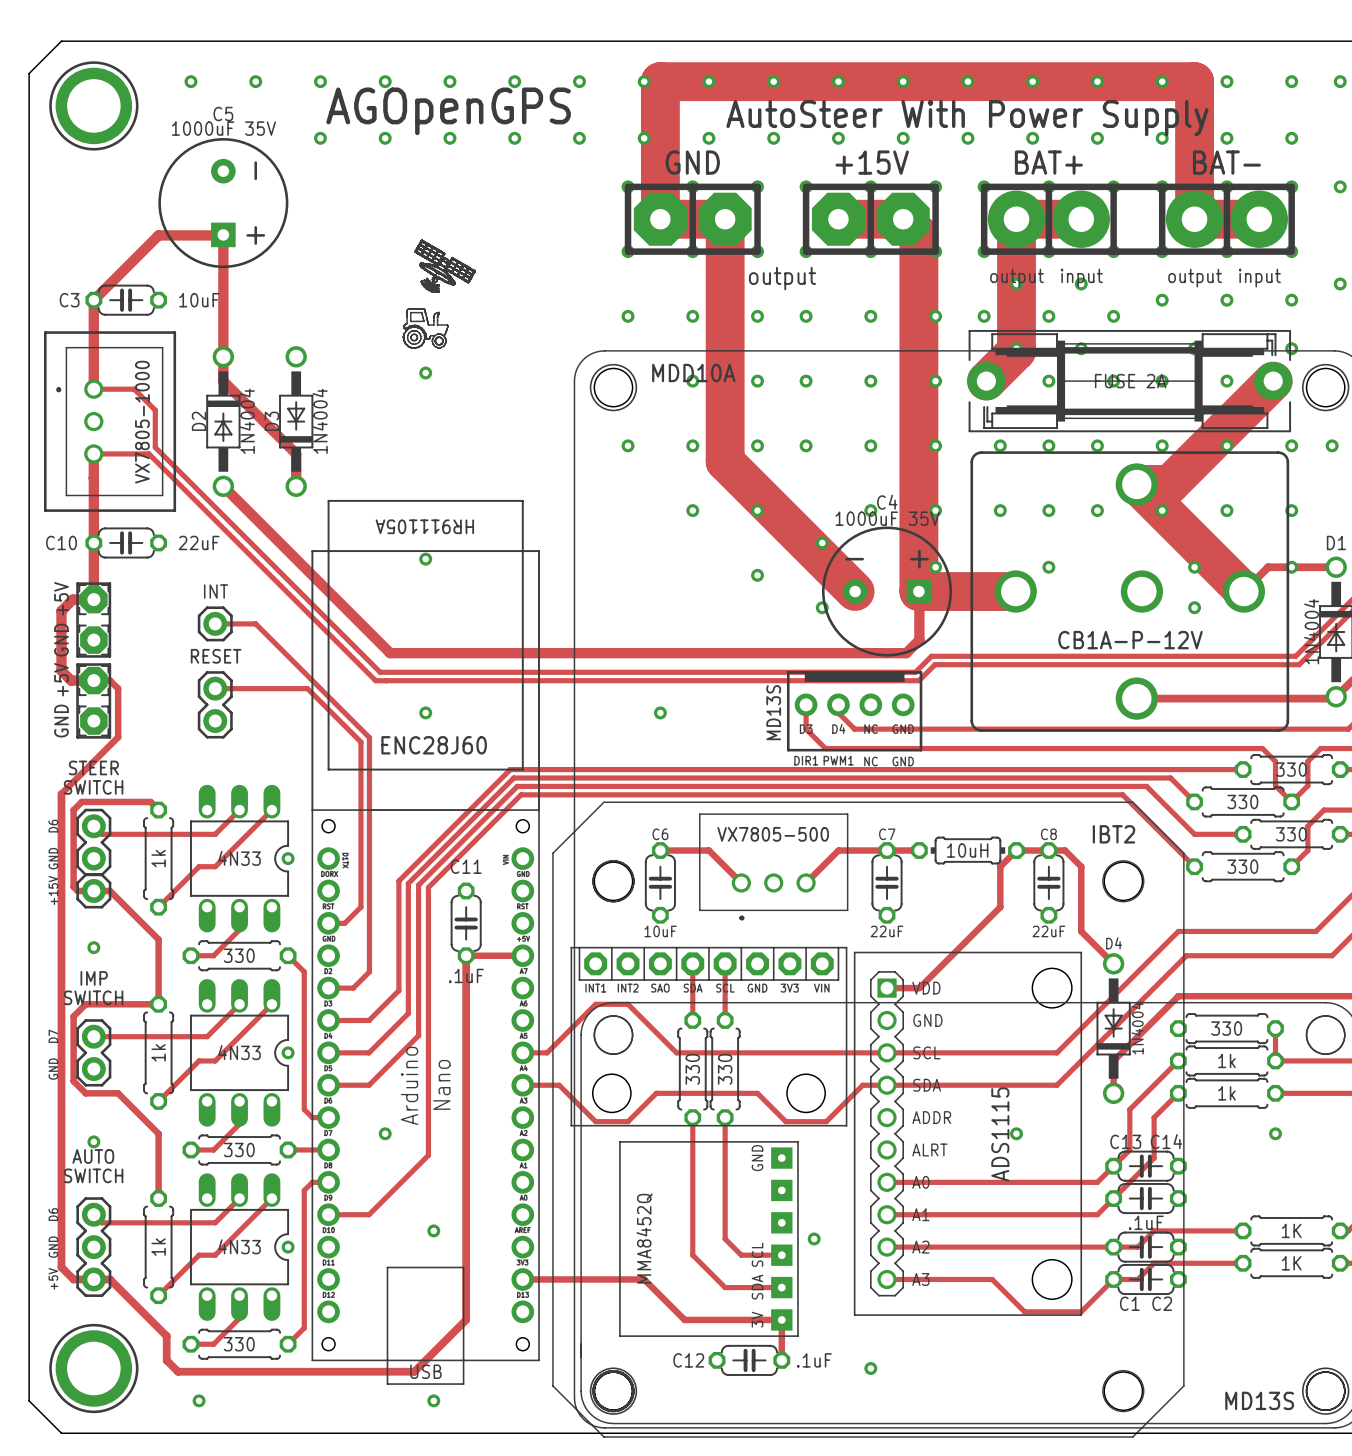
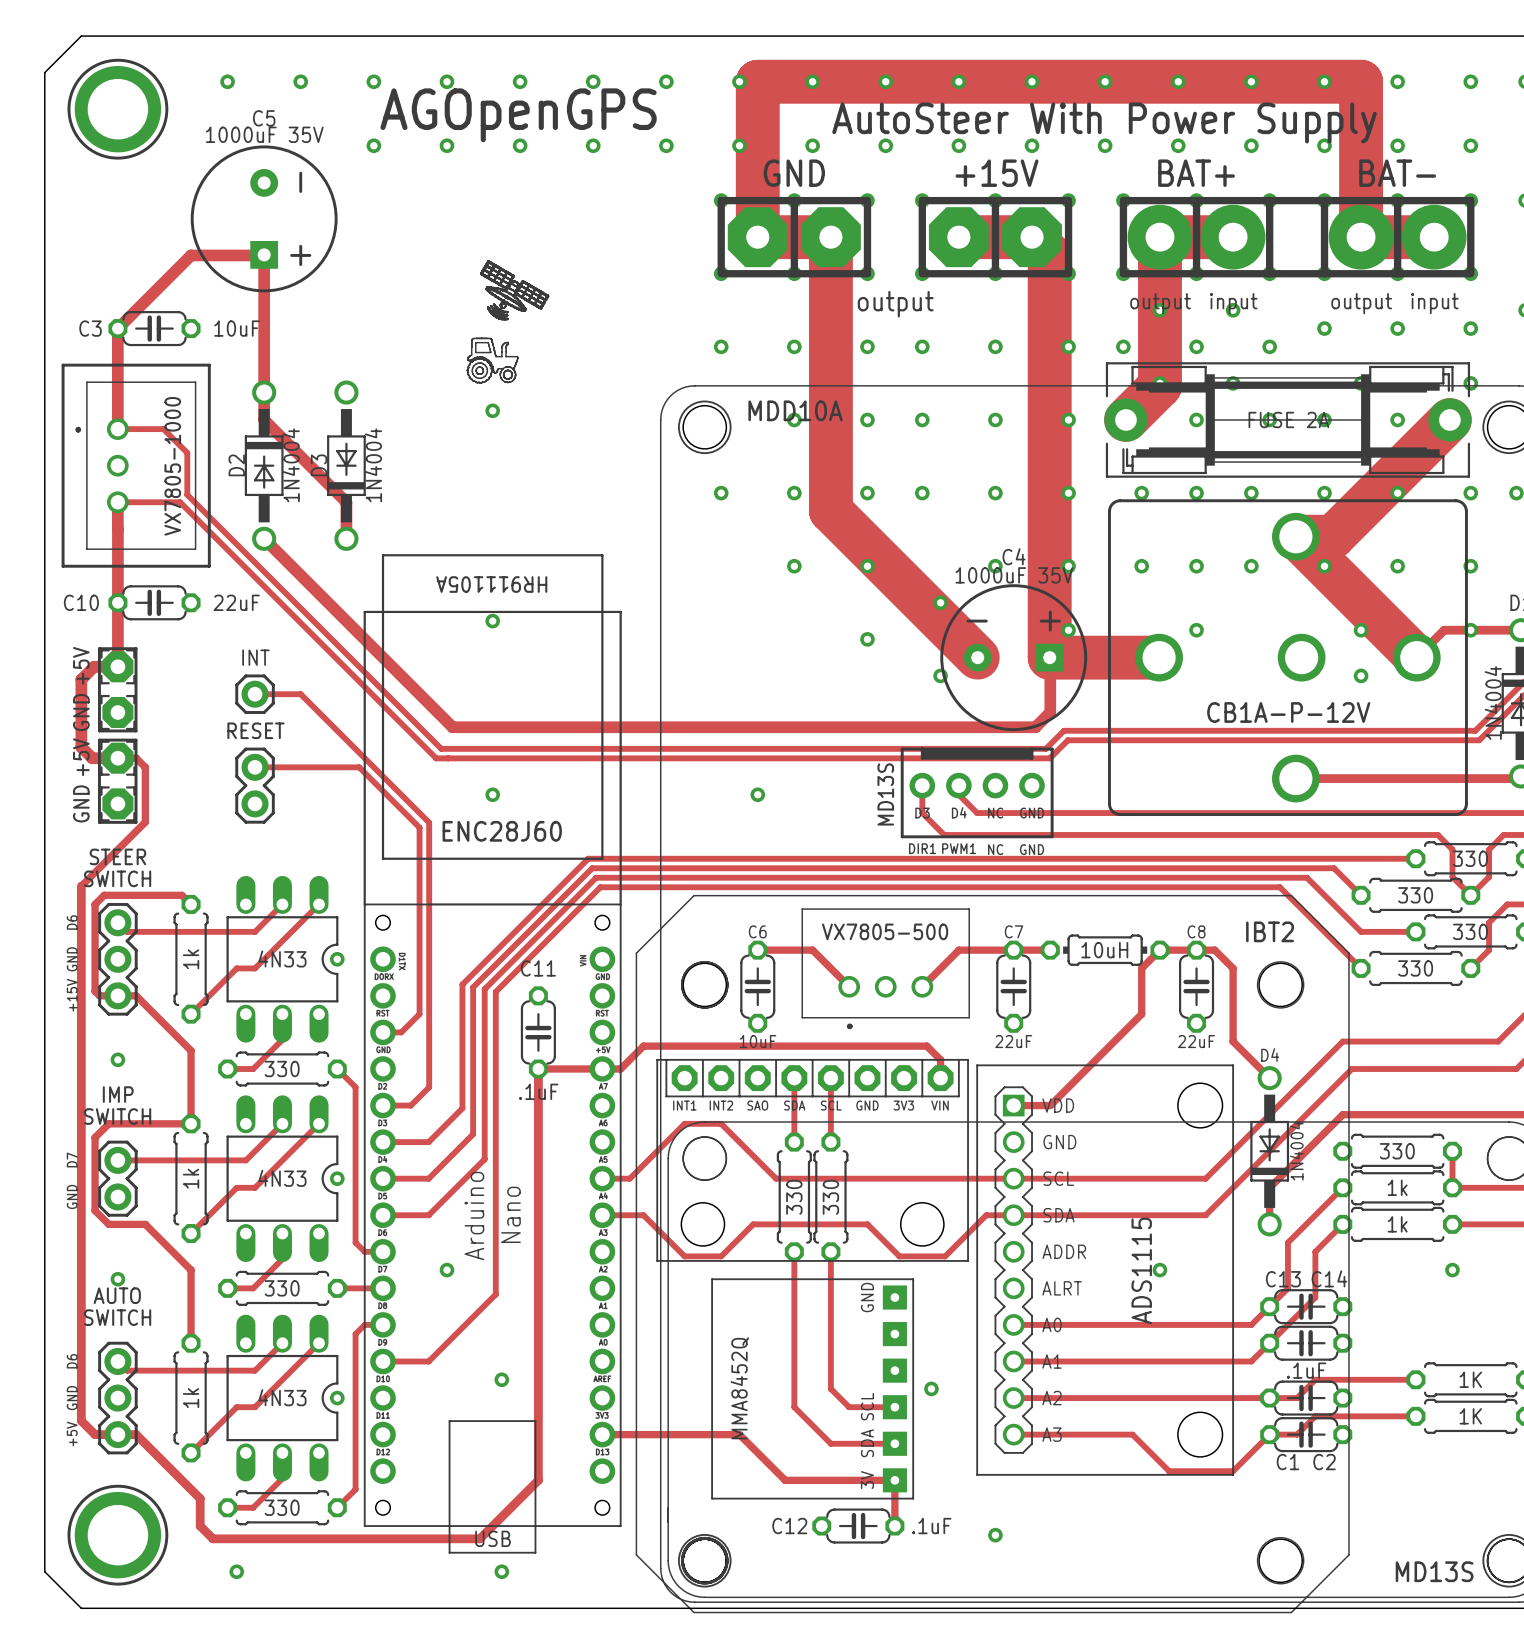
part: (93, 842) -> none
part: none -> (117, 959)
part: (93, 890) -> none
track: none -> (602, 1068) (620, 1068) (643, 1046) (926, 1046) (940, 1059) (940, 1078)

